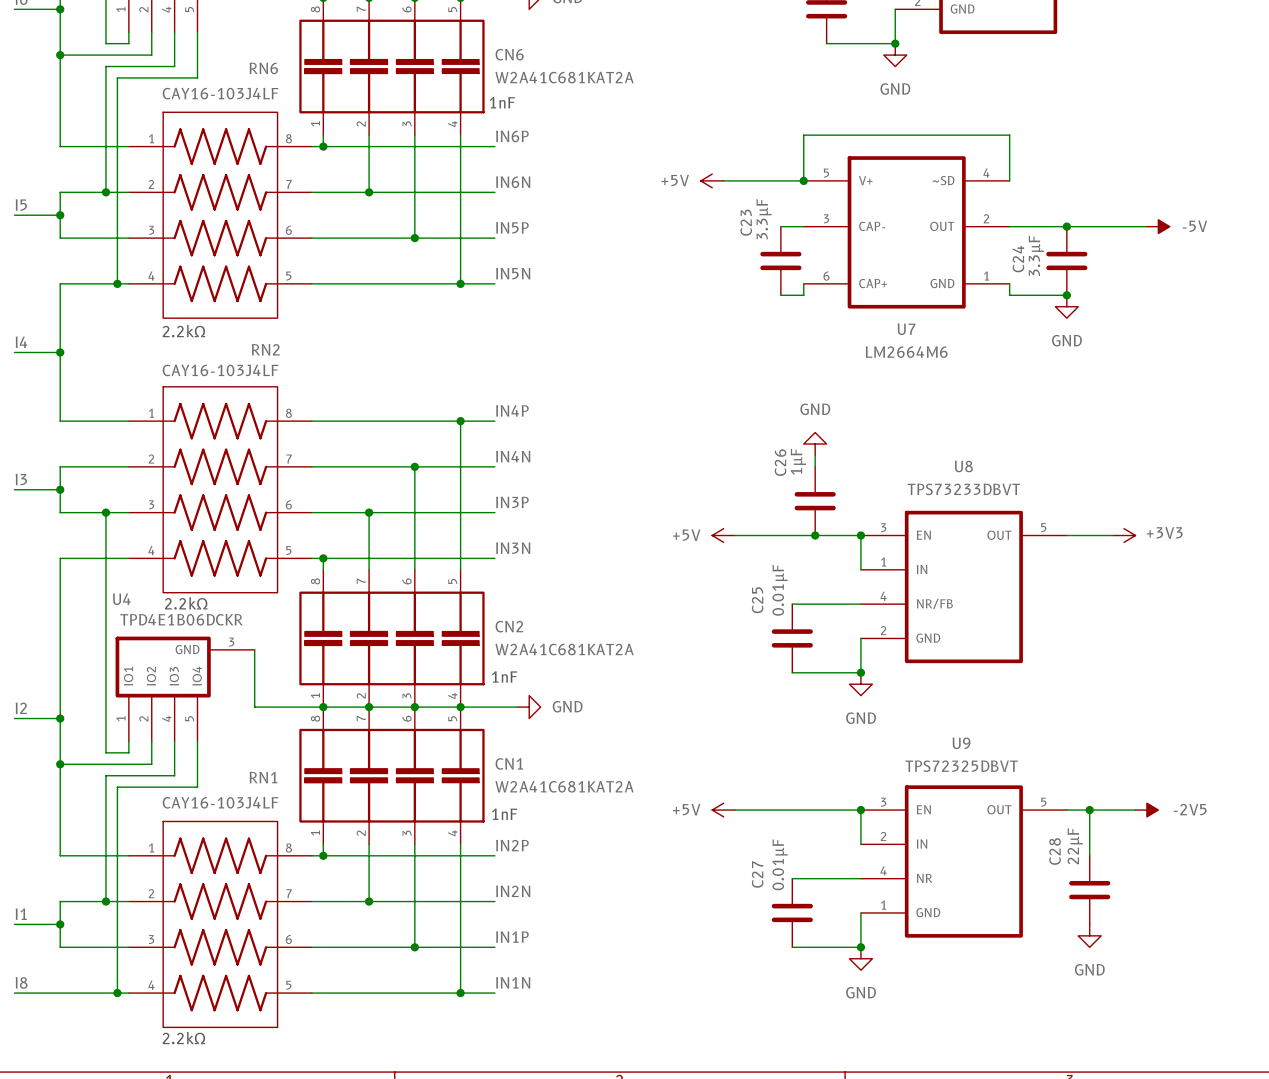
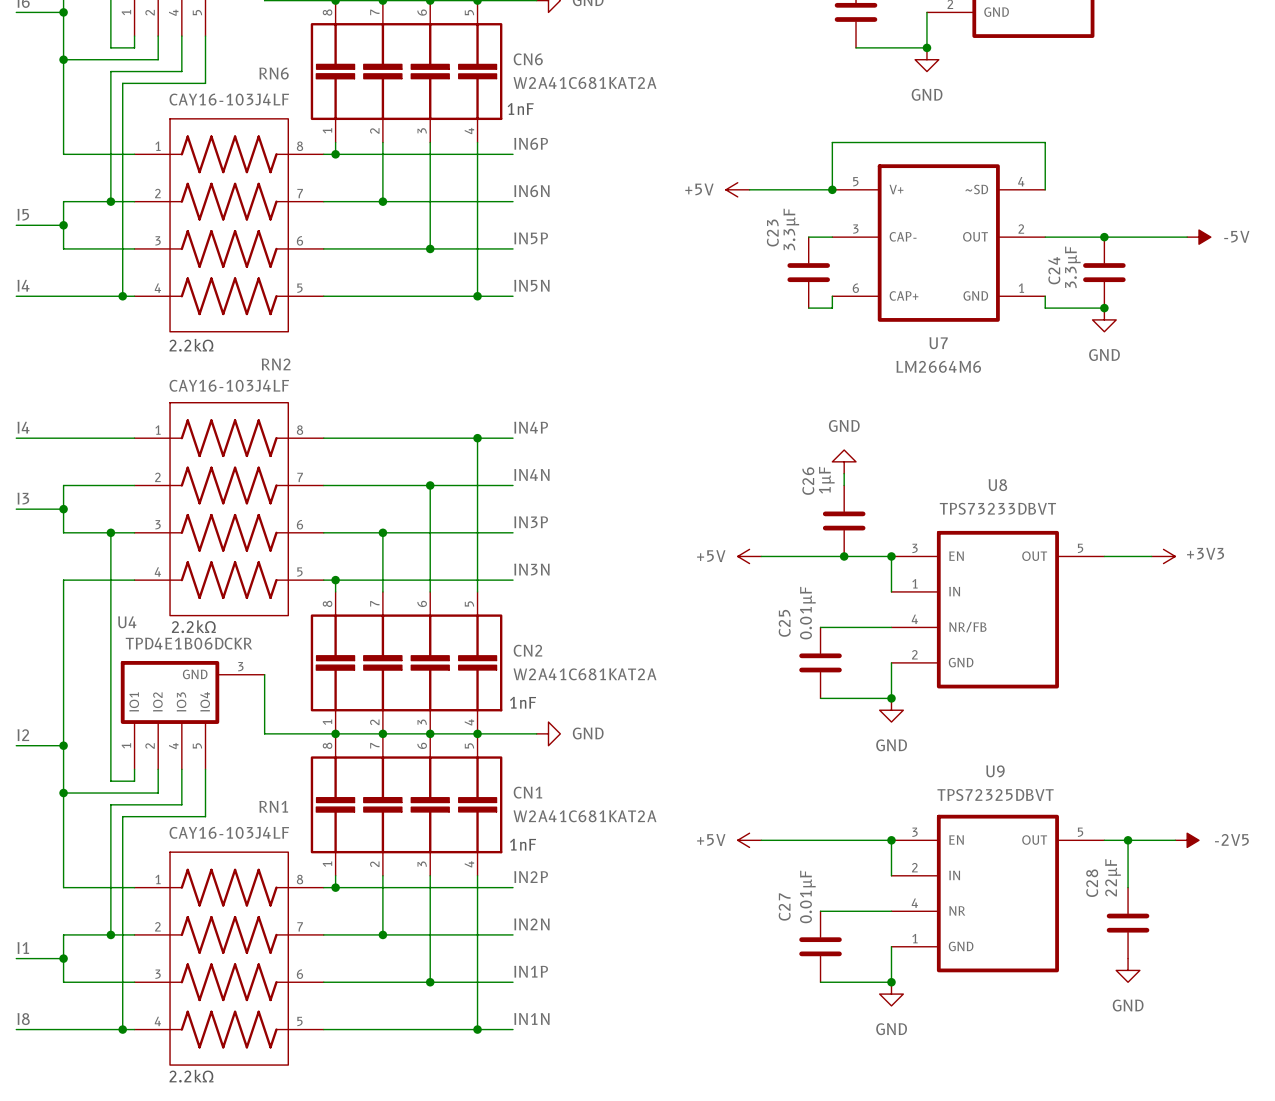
label: none -> I4 (23, 285)
wire: (60, 283) (60, 421) -> (63, 296) (16, 296)
label: I4 (21, 342) -> none
wire: (14, 352) (60, 352) -> (16, 438) (63, 438)
junction: (60, 352) -> none
label: none -> I4 (23, 427)

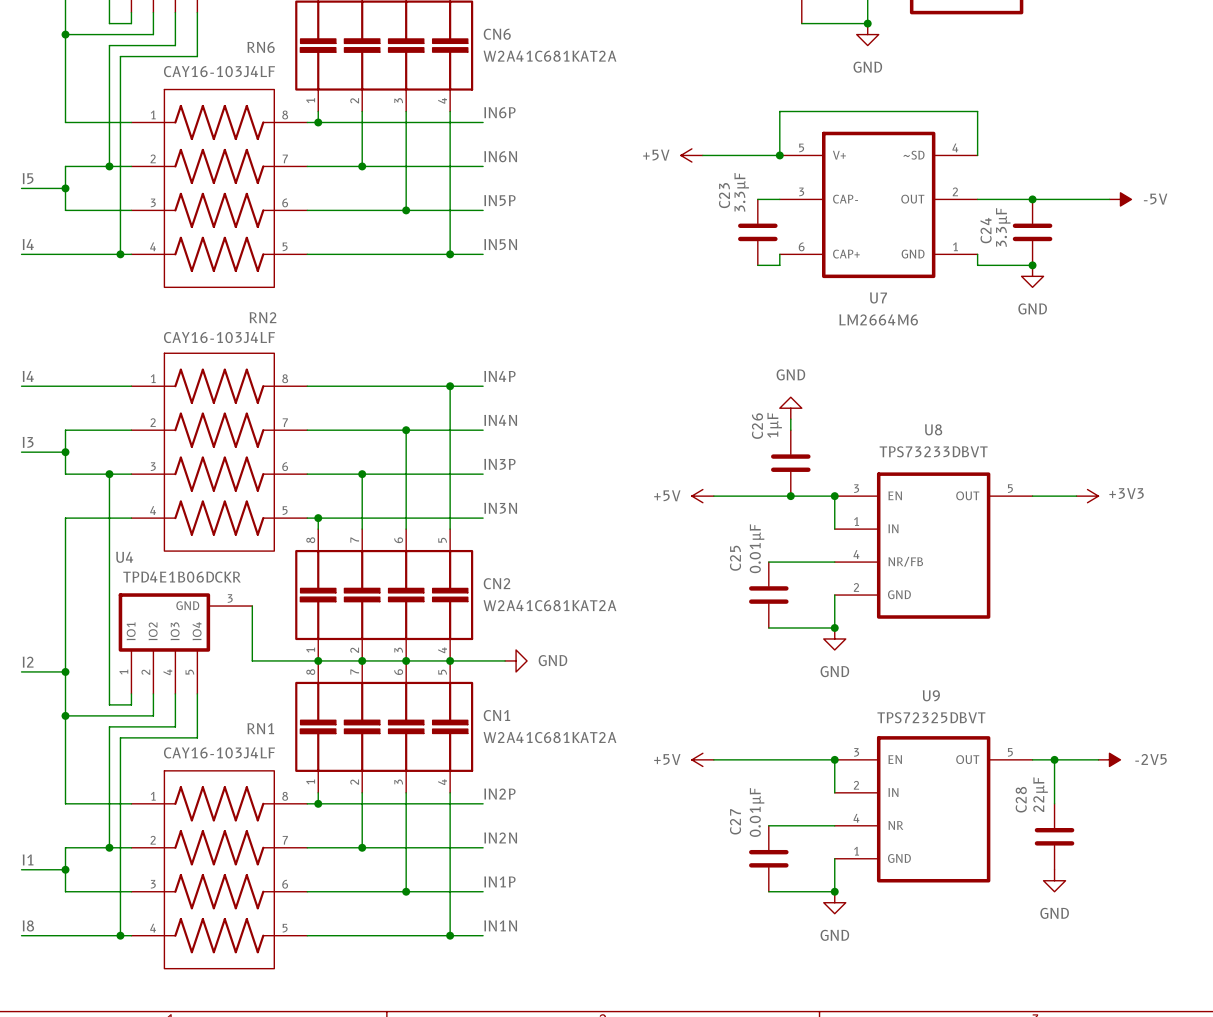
text: 1nF (520, 108) -> none
text: 2.2kΩ (191, 345) -> none
text: 2.2kΩ (193, 626) -> none
text: 1nF (523, 702) -> none
text: 1nF (523, 844) -> none
text: 2.2kΩ (191, 1076) -> none

